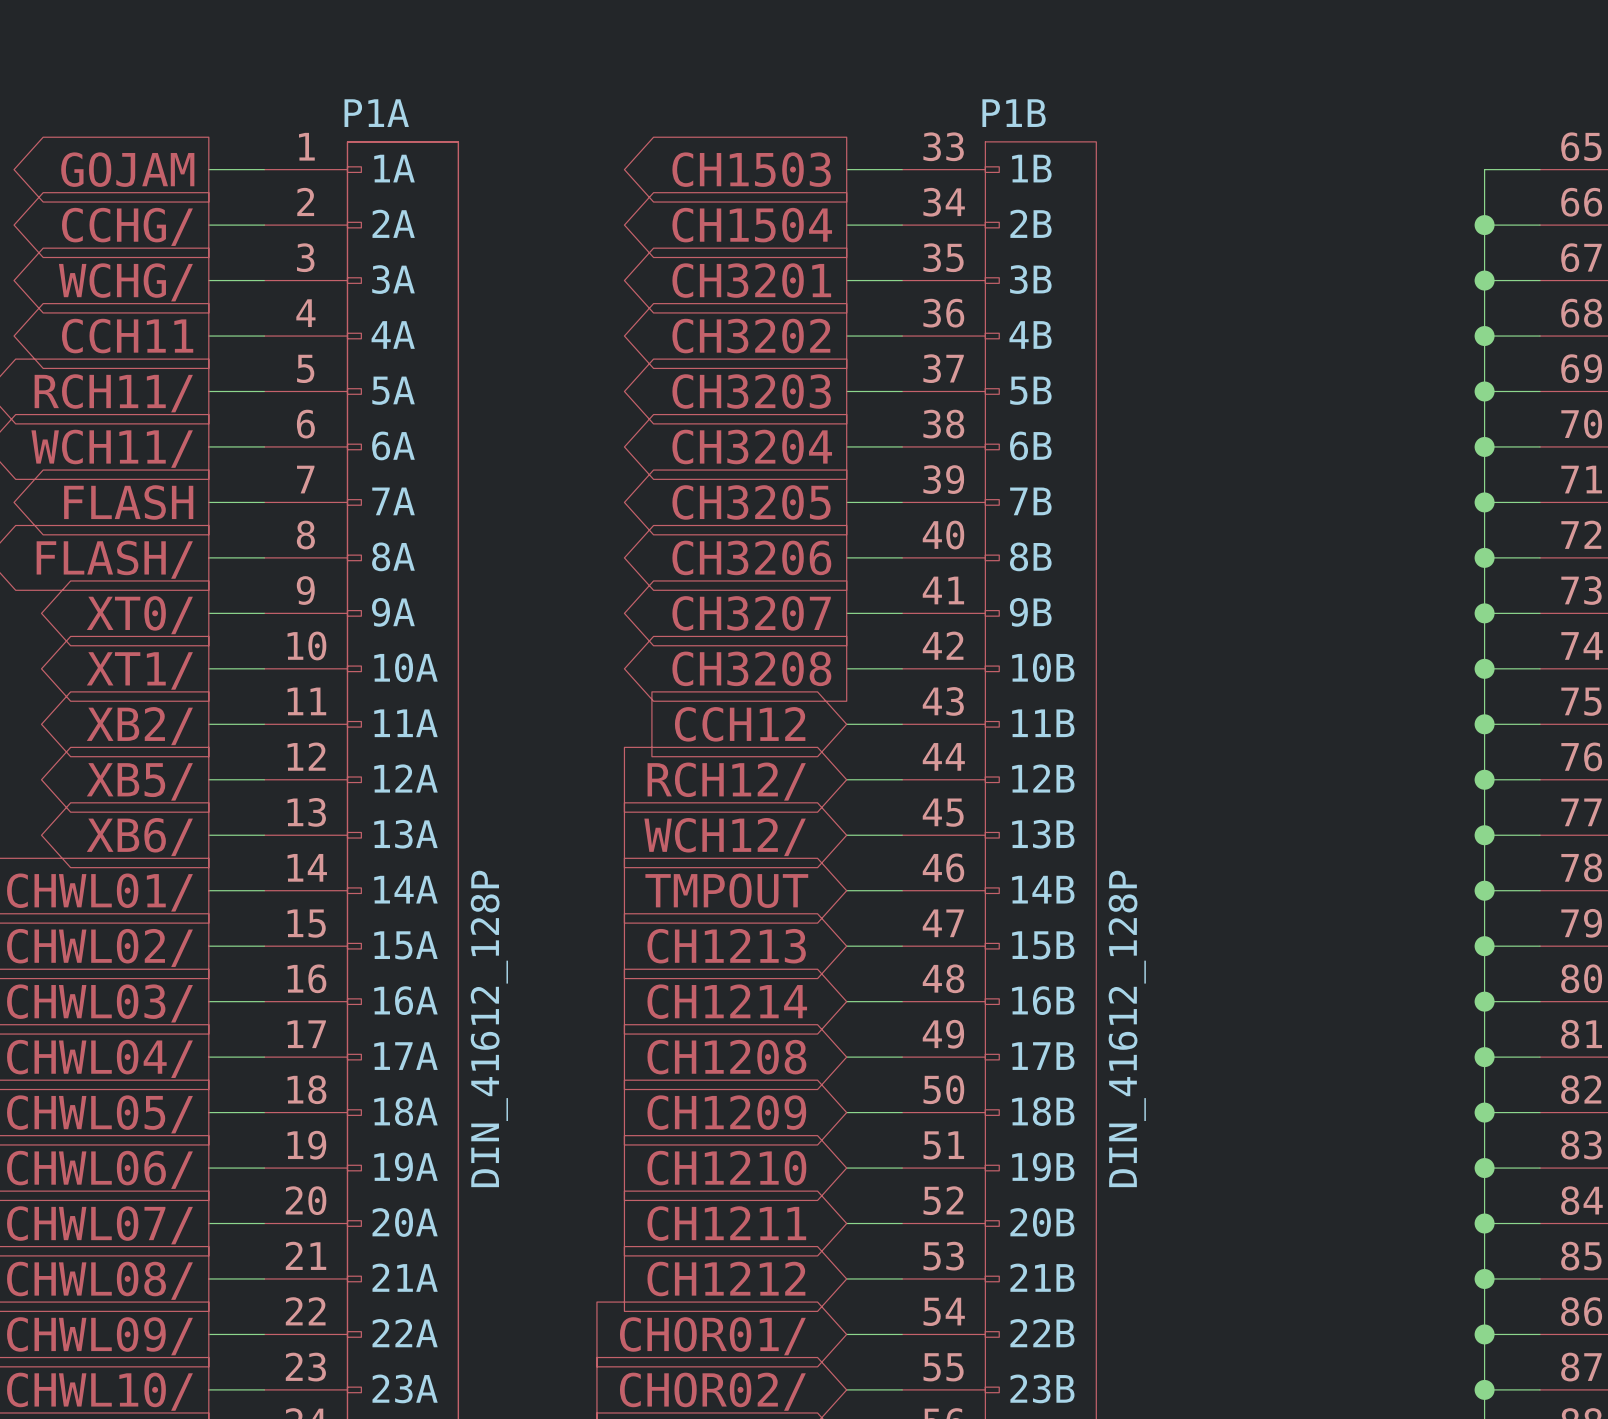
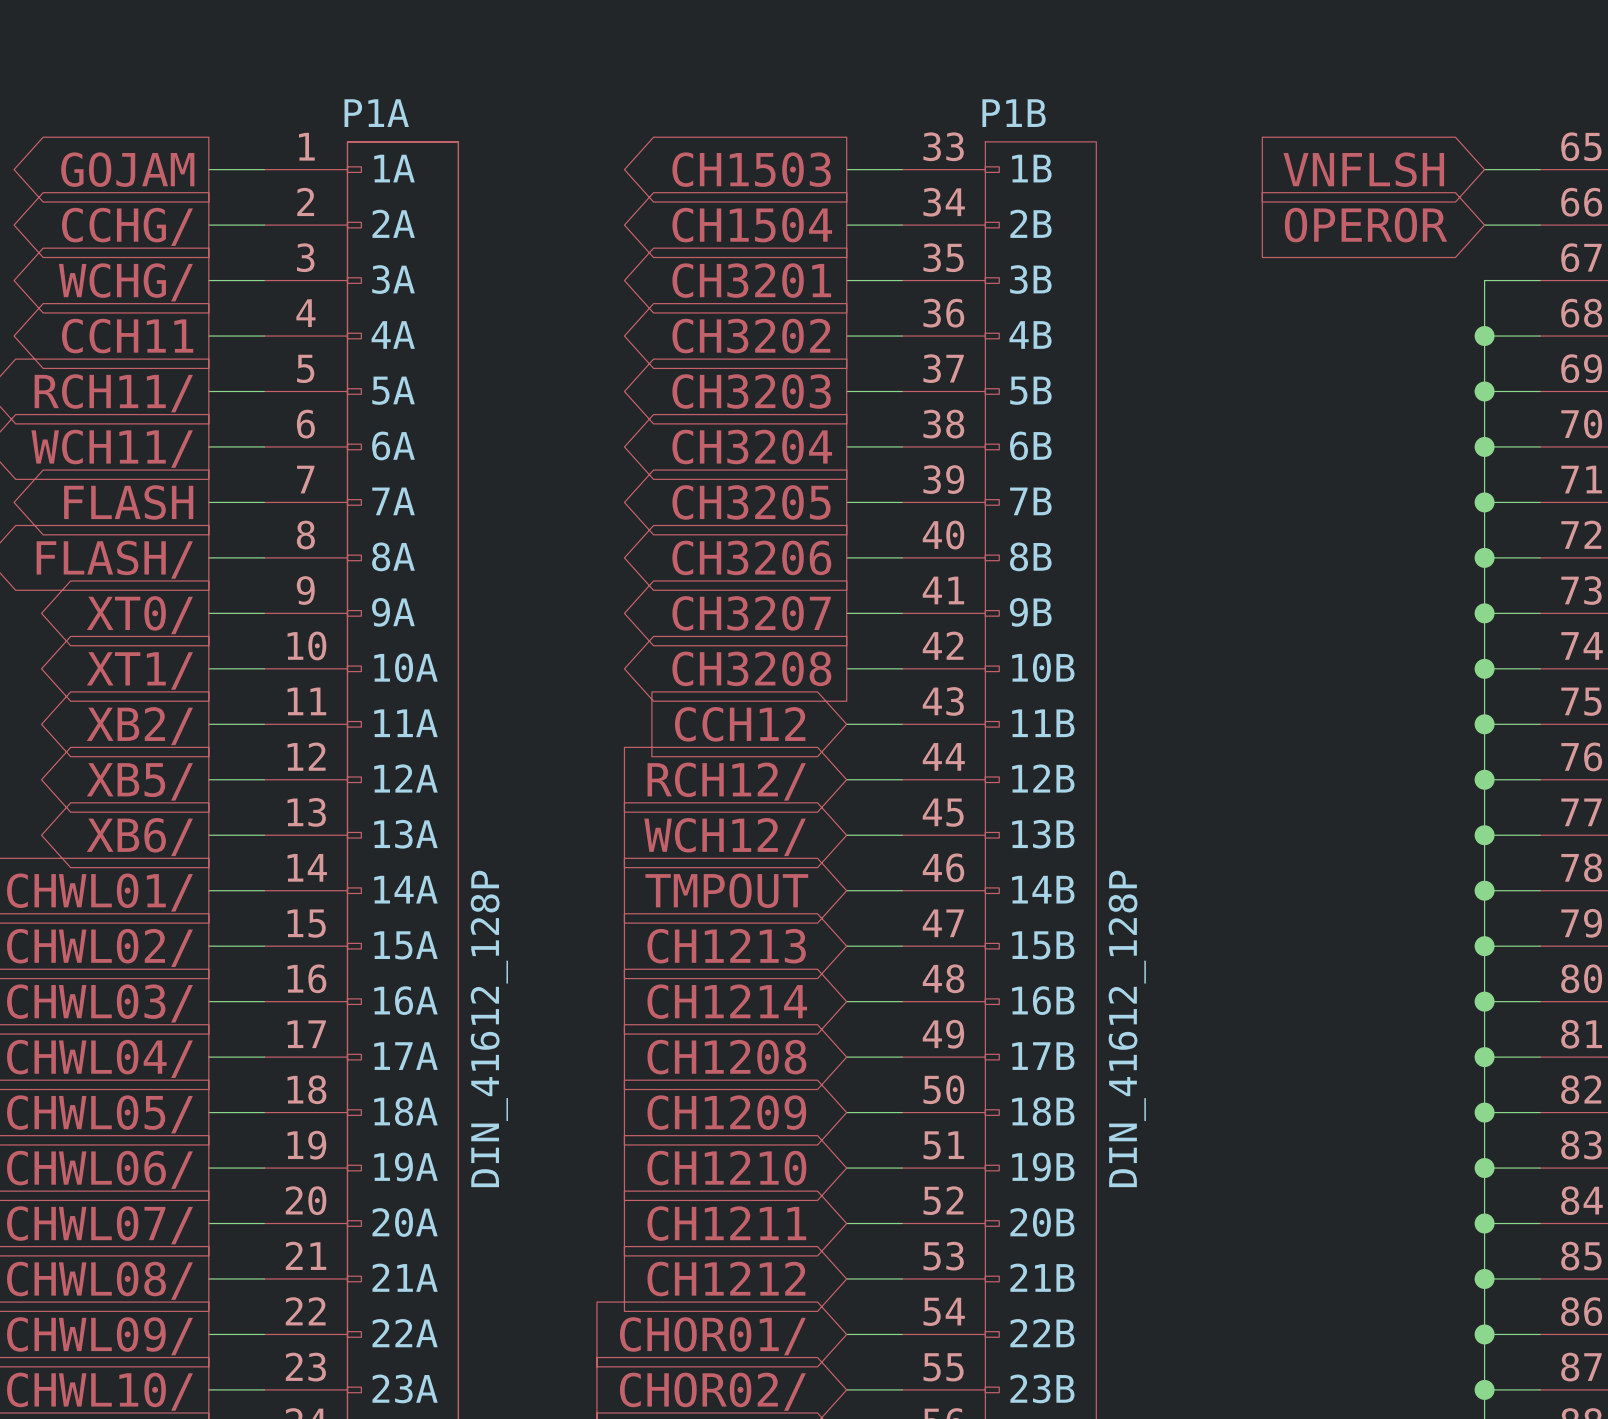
global label: none -> VNFLSH (1363, 169)
wire: (1484, 169) (1484, 280) -> none
global label: none -> OPEROR (1366, 225)
junction: (1484, 225) -> none
junction: (1484, 280) -> none

